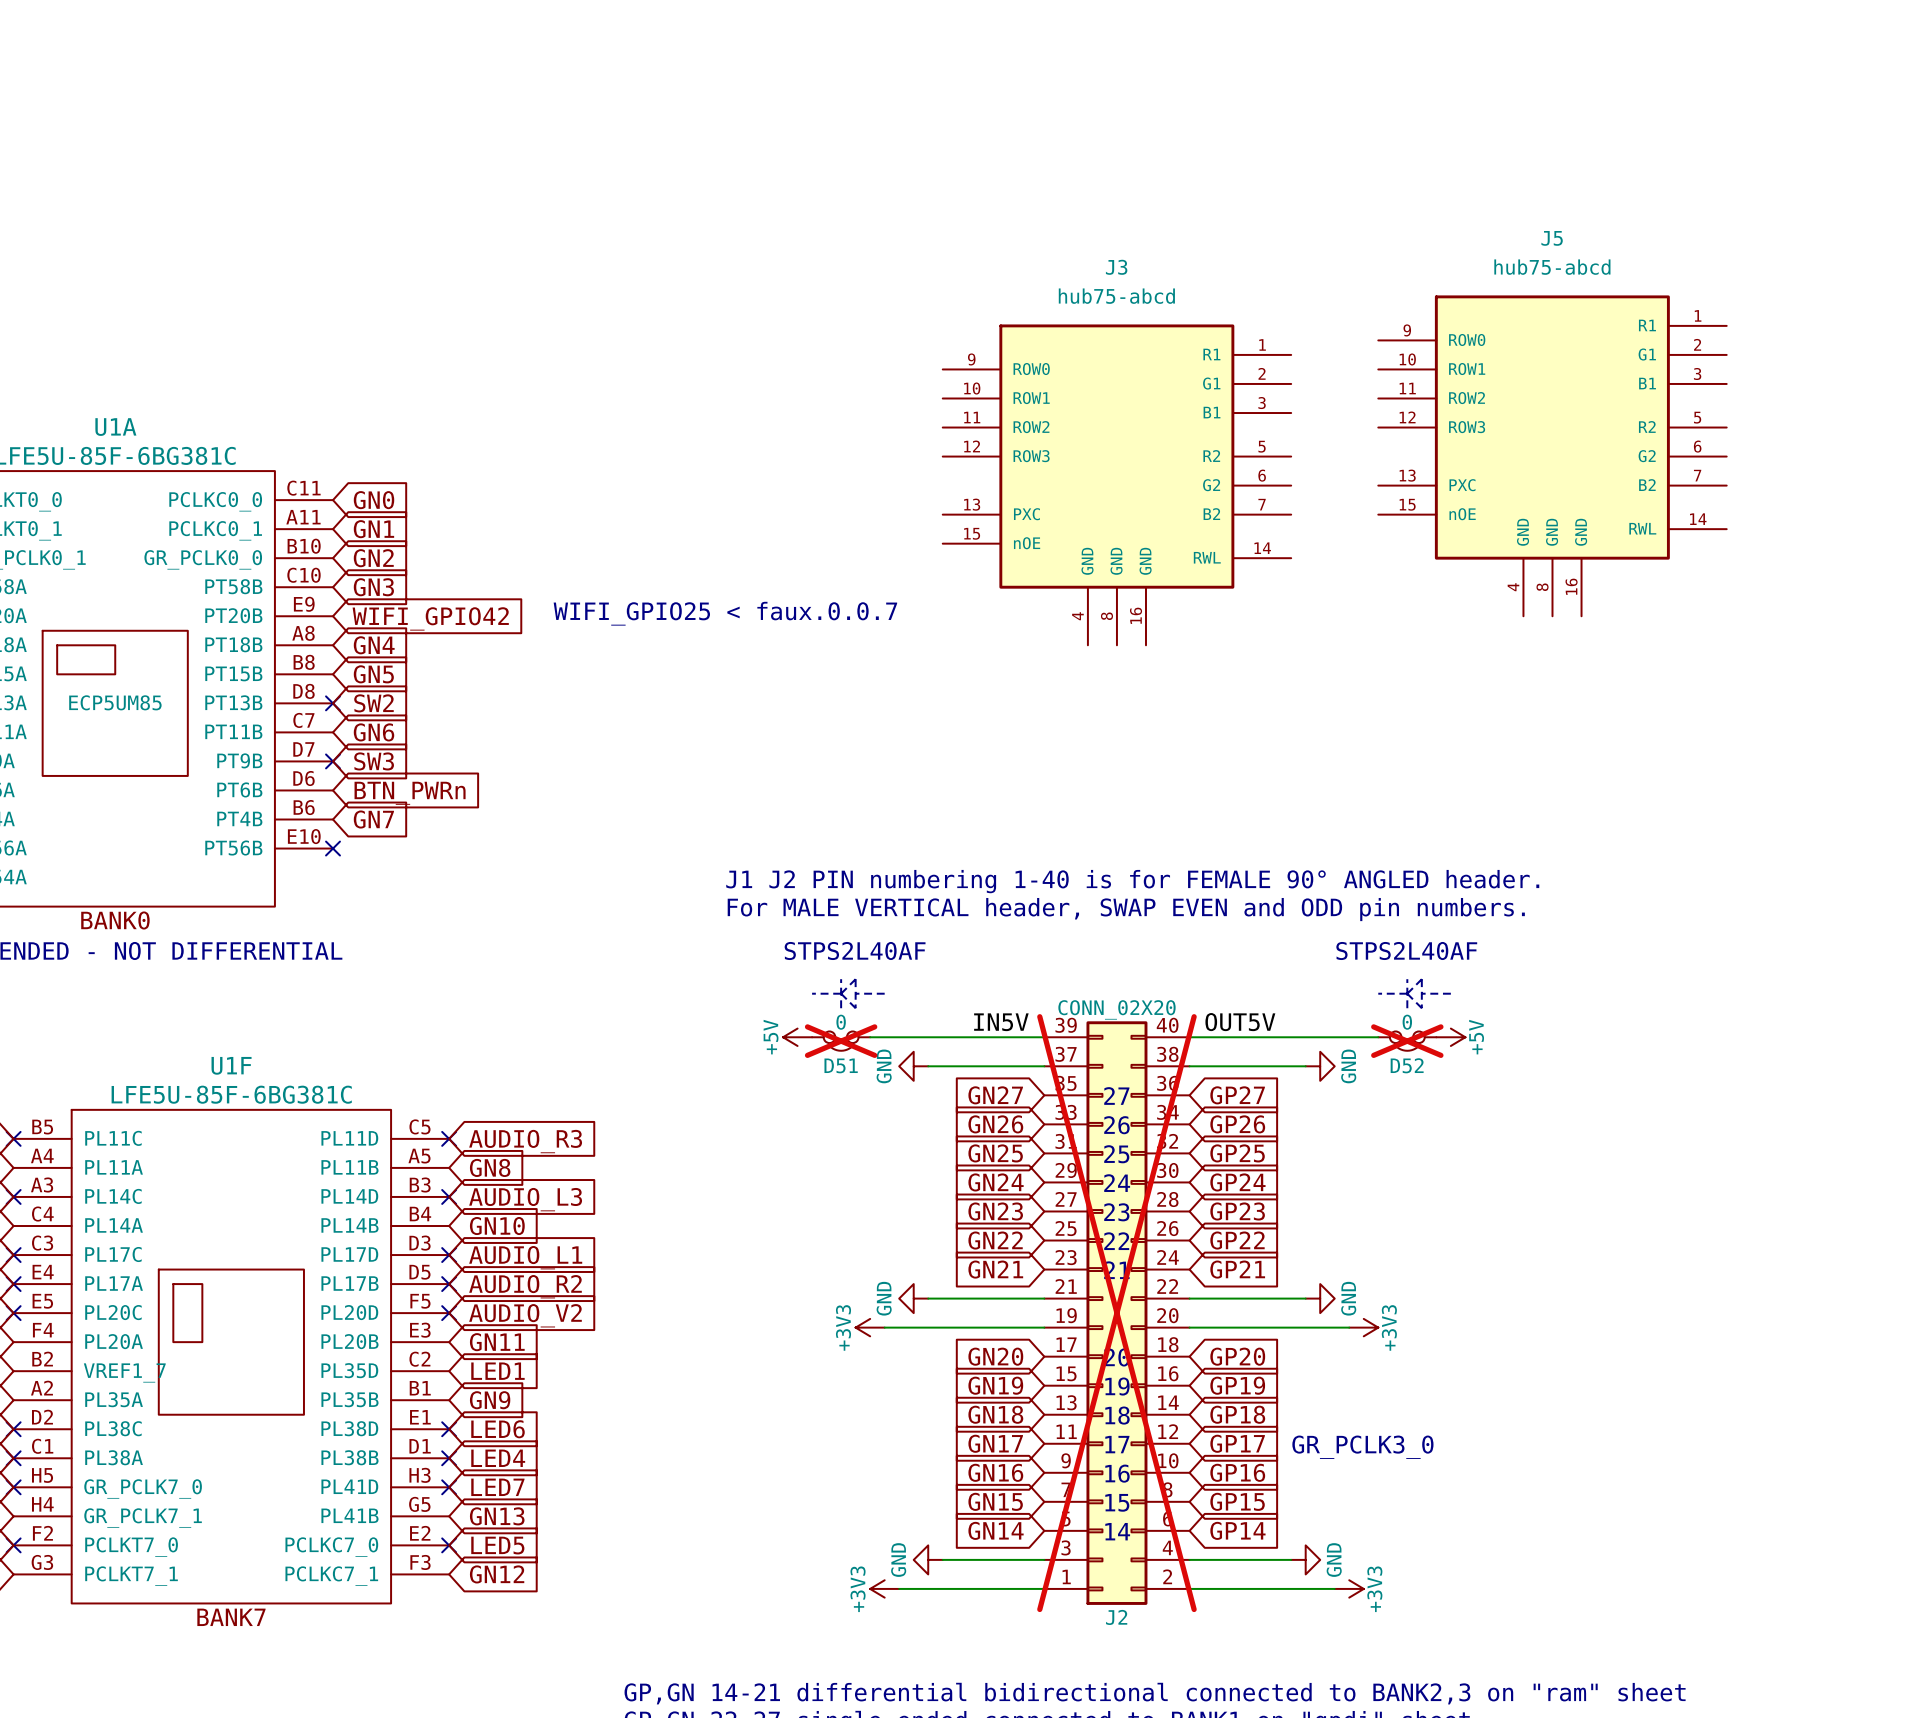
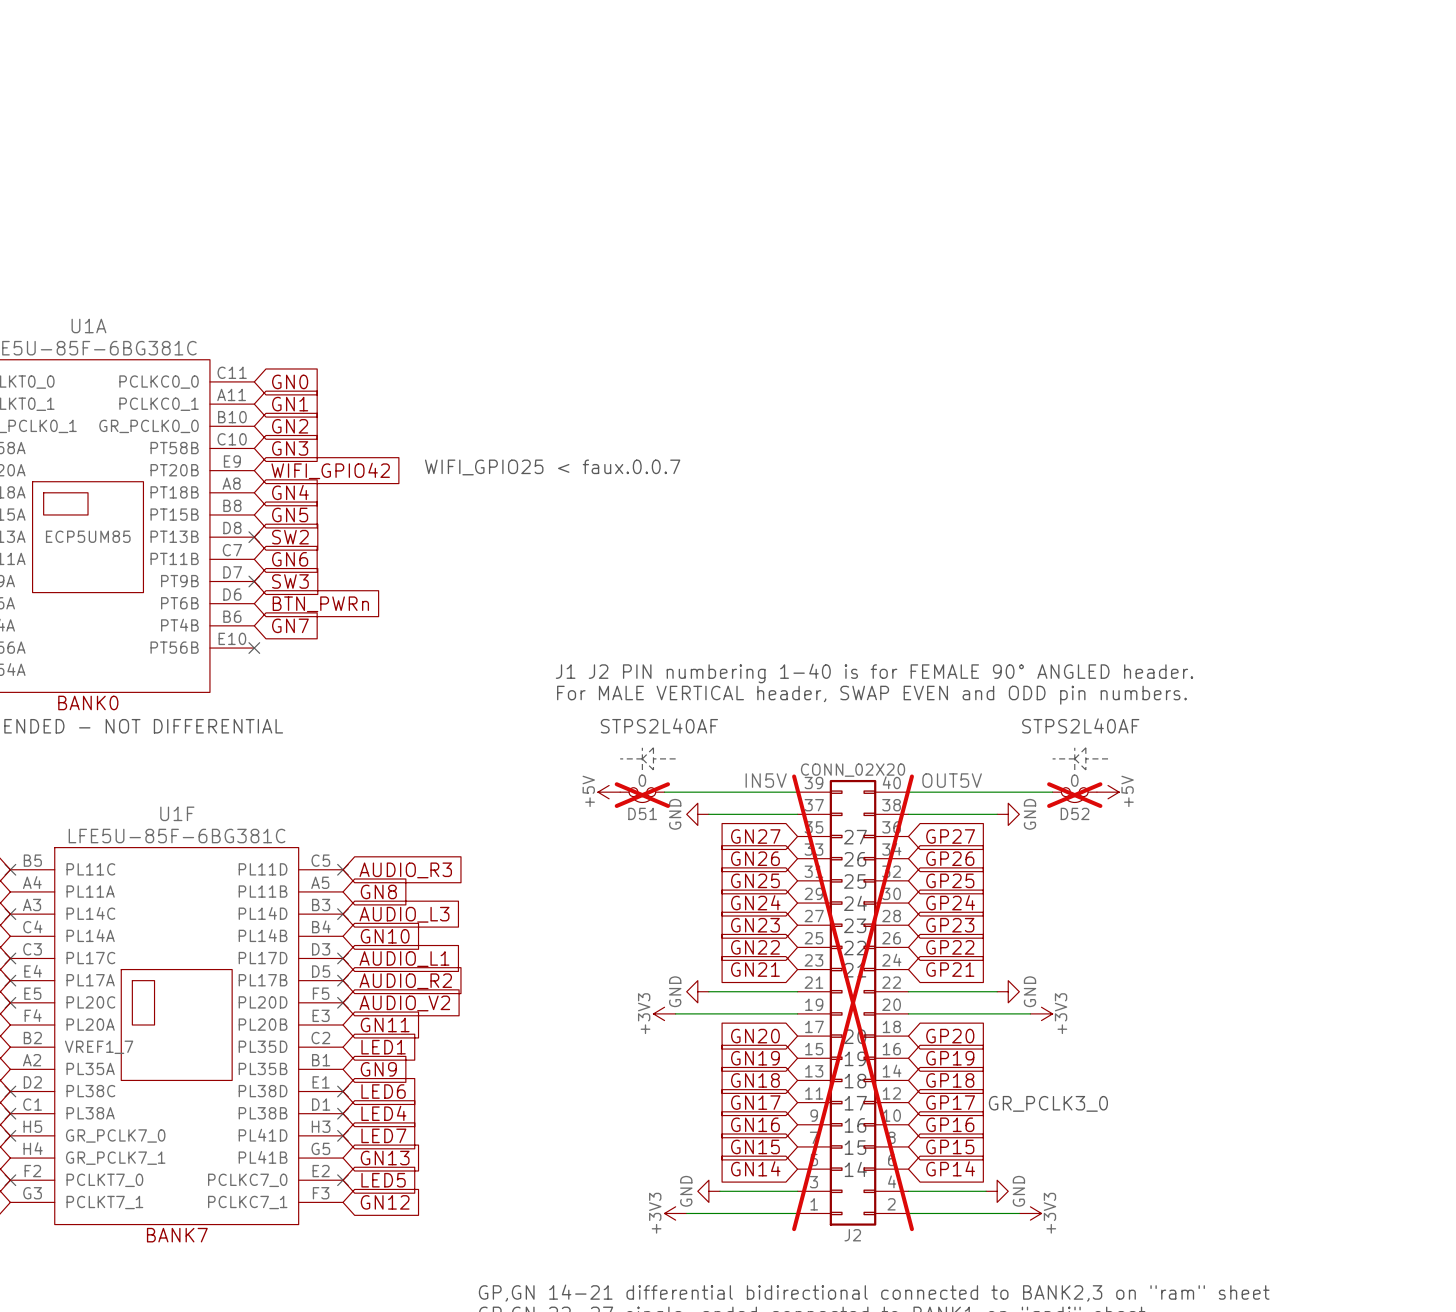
J5: hub75-abcd (1552, 455) -> none
J3: hub75-abcd (1116, 484) -> none

